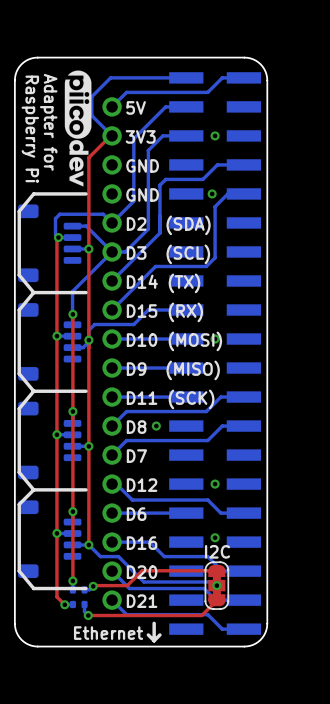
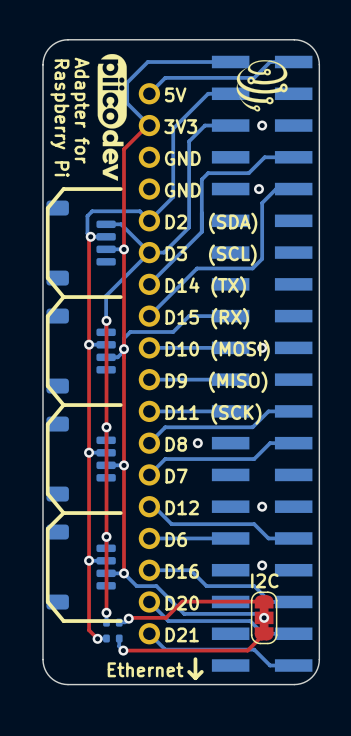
drawing: none -> [236, 60, 288, 112]

